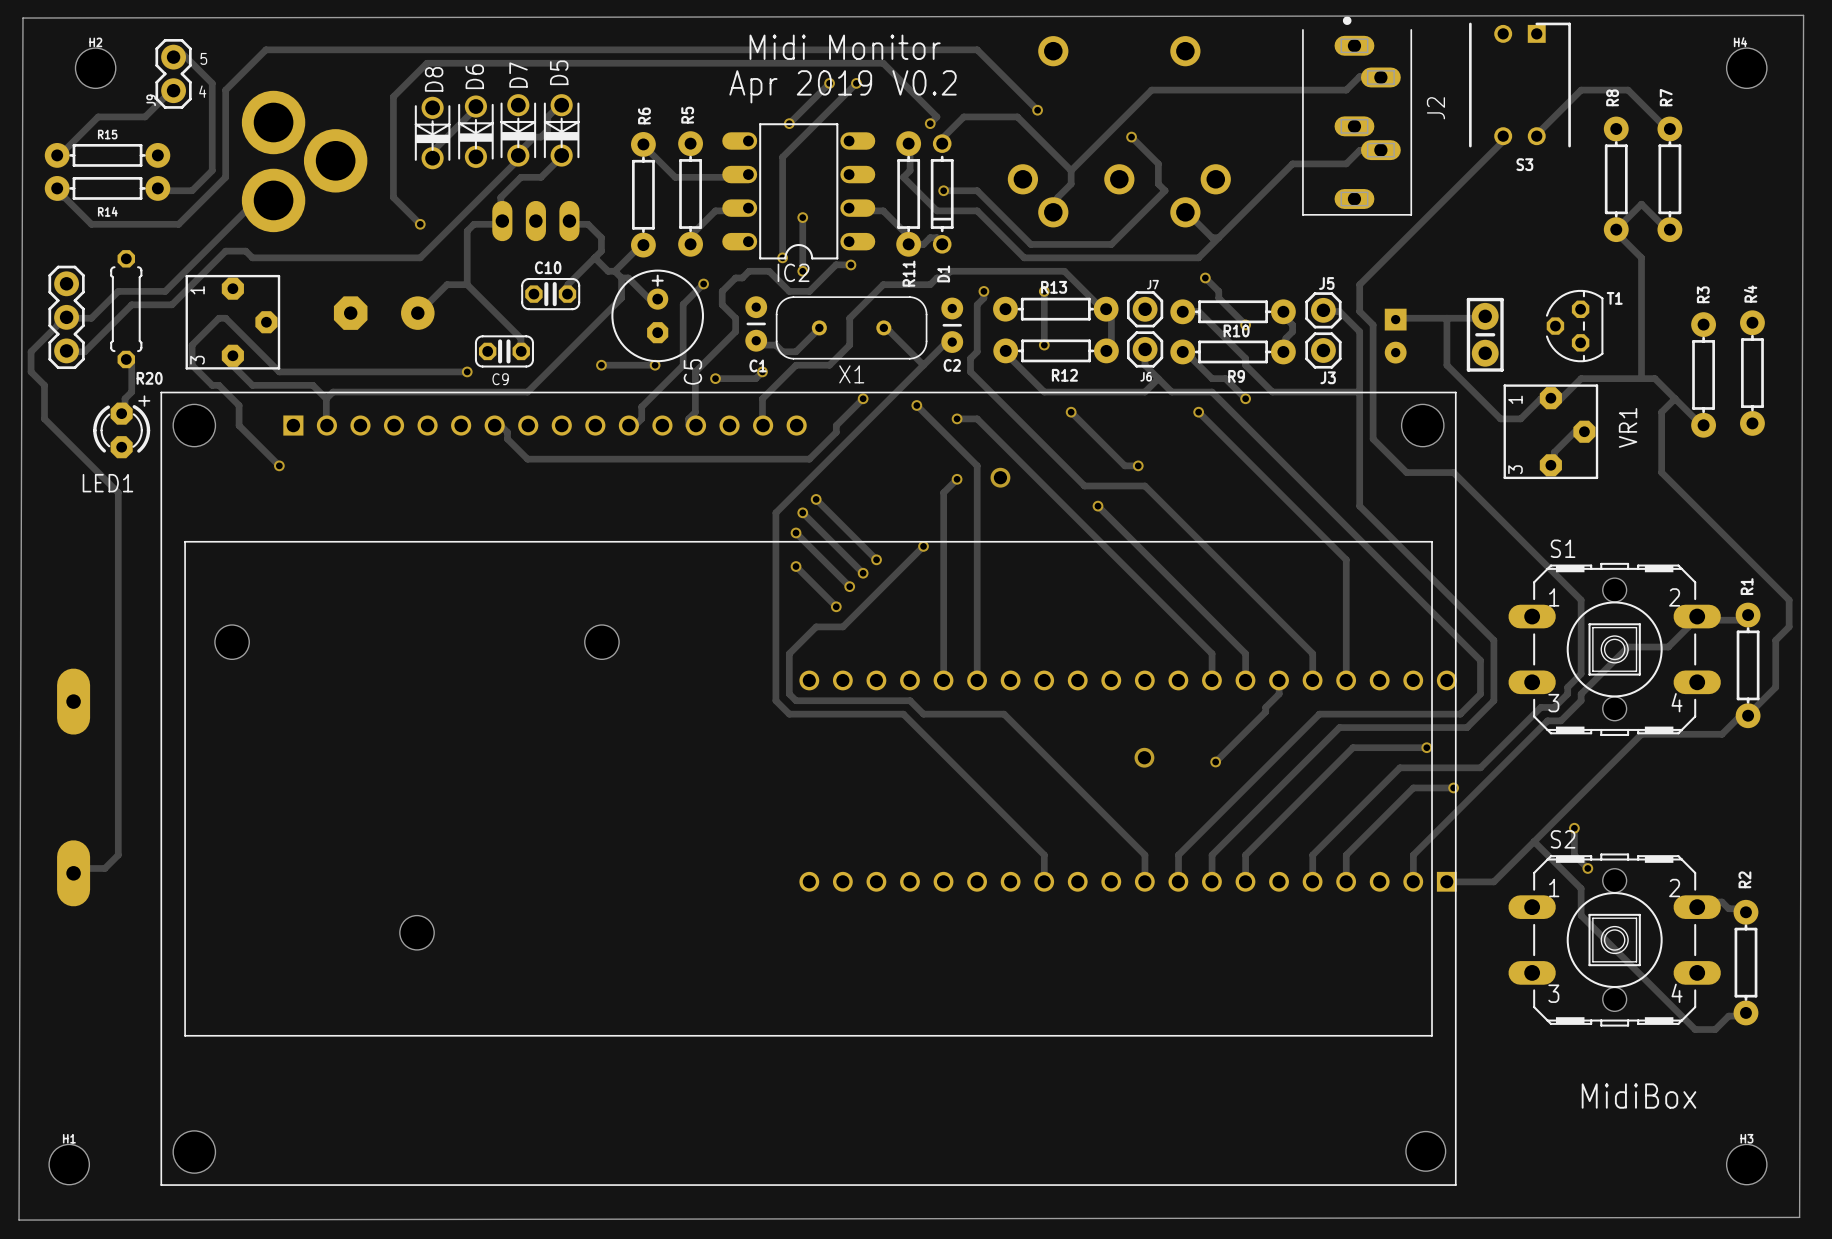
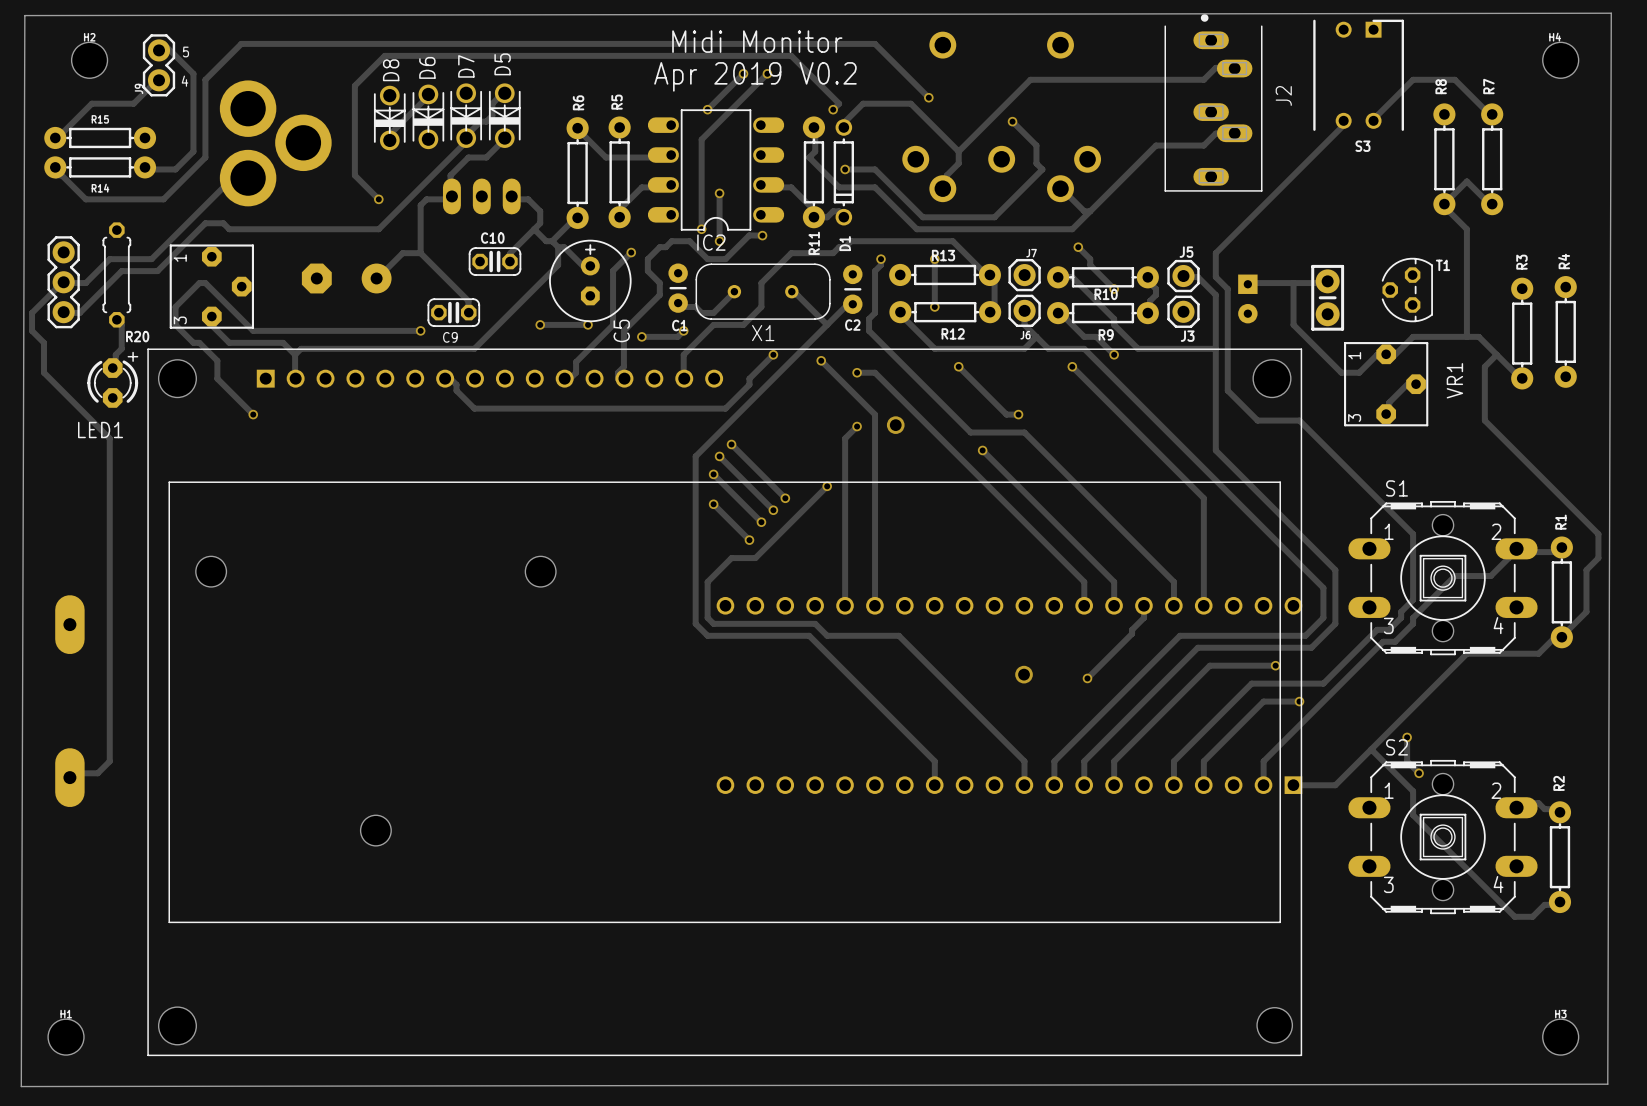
text: MidiBox (1639, 1096) -> none

